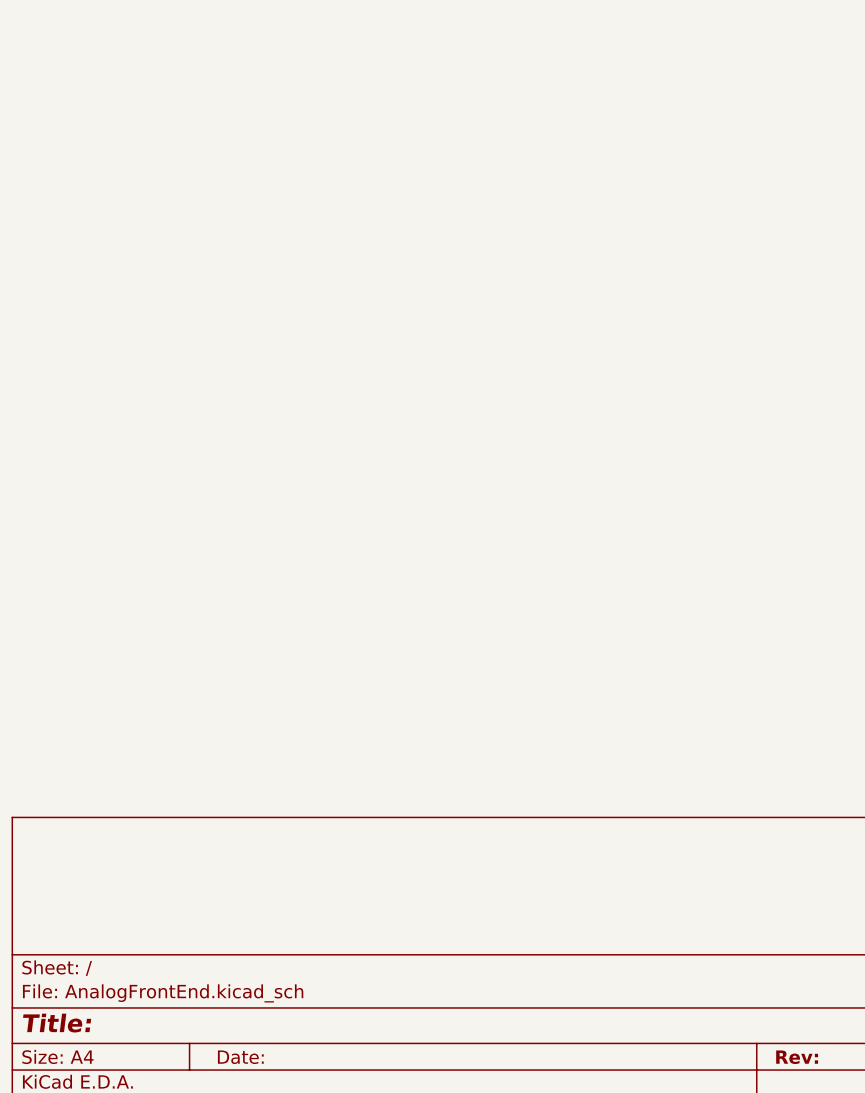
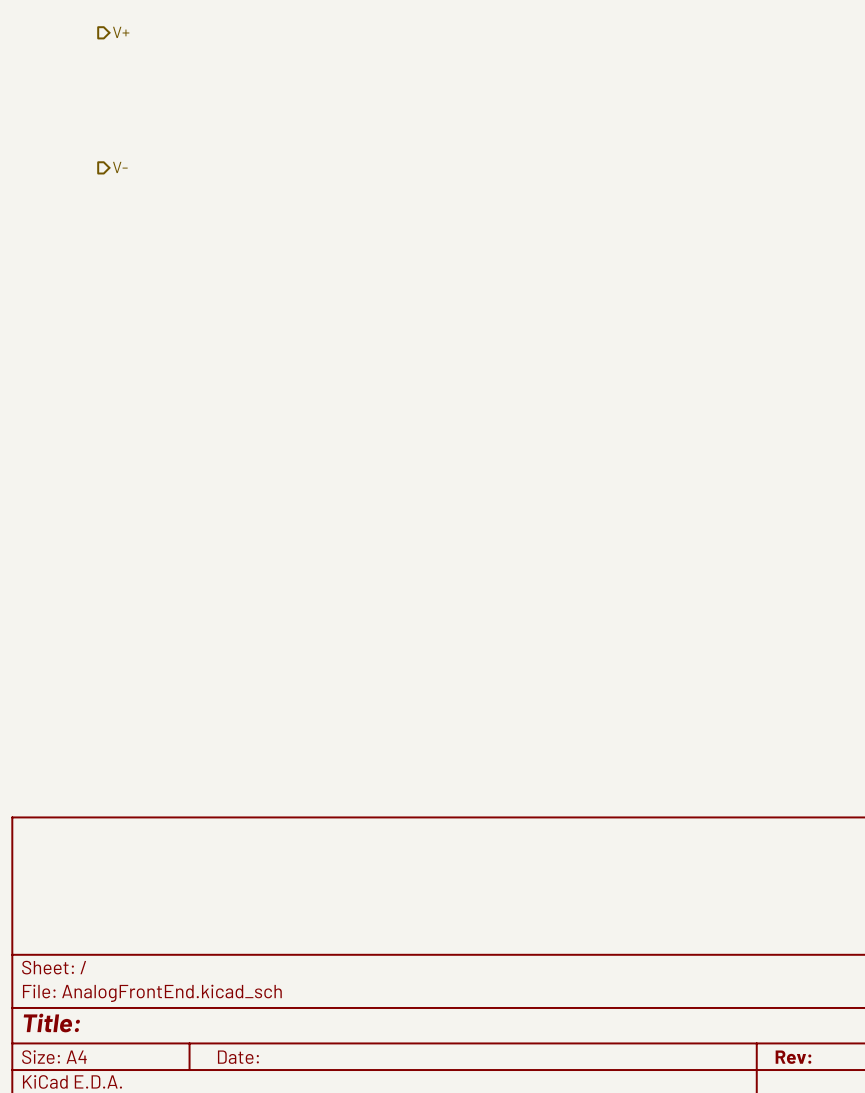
hierarchical label: none -> V+ (121, 32)
hierarchical label: none -> V- (120, 167)

